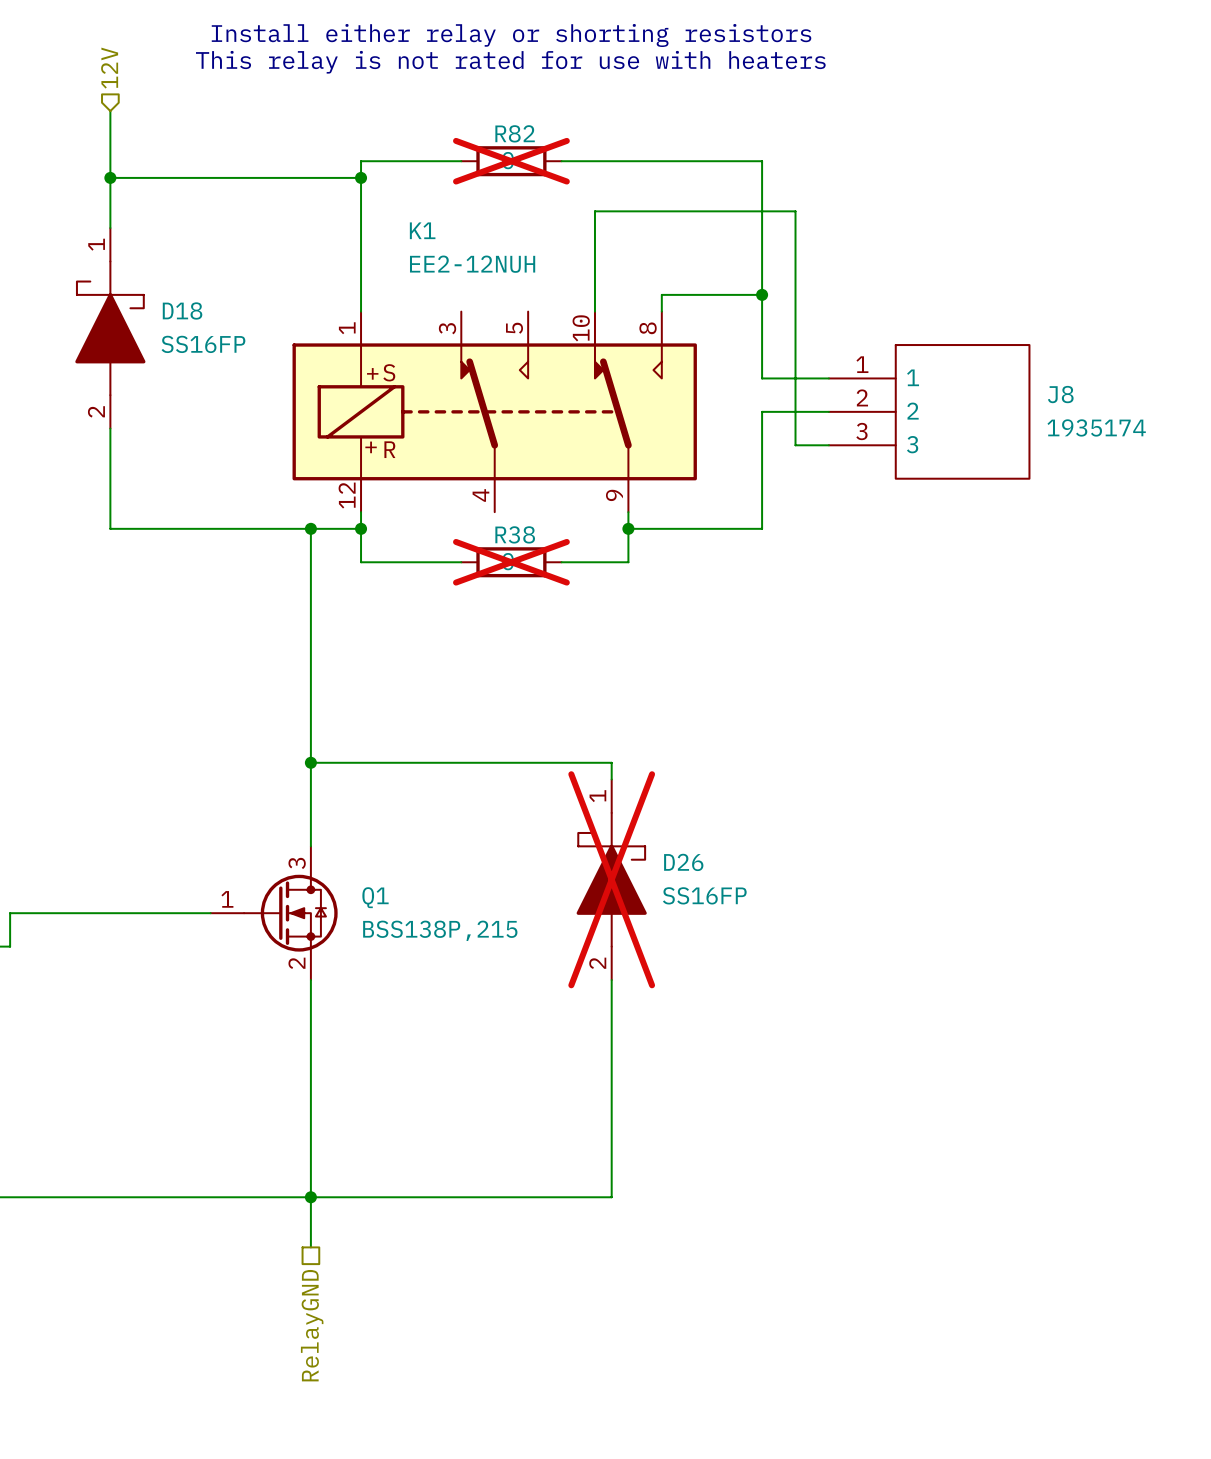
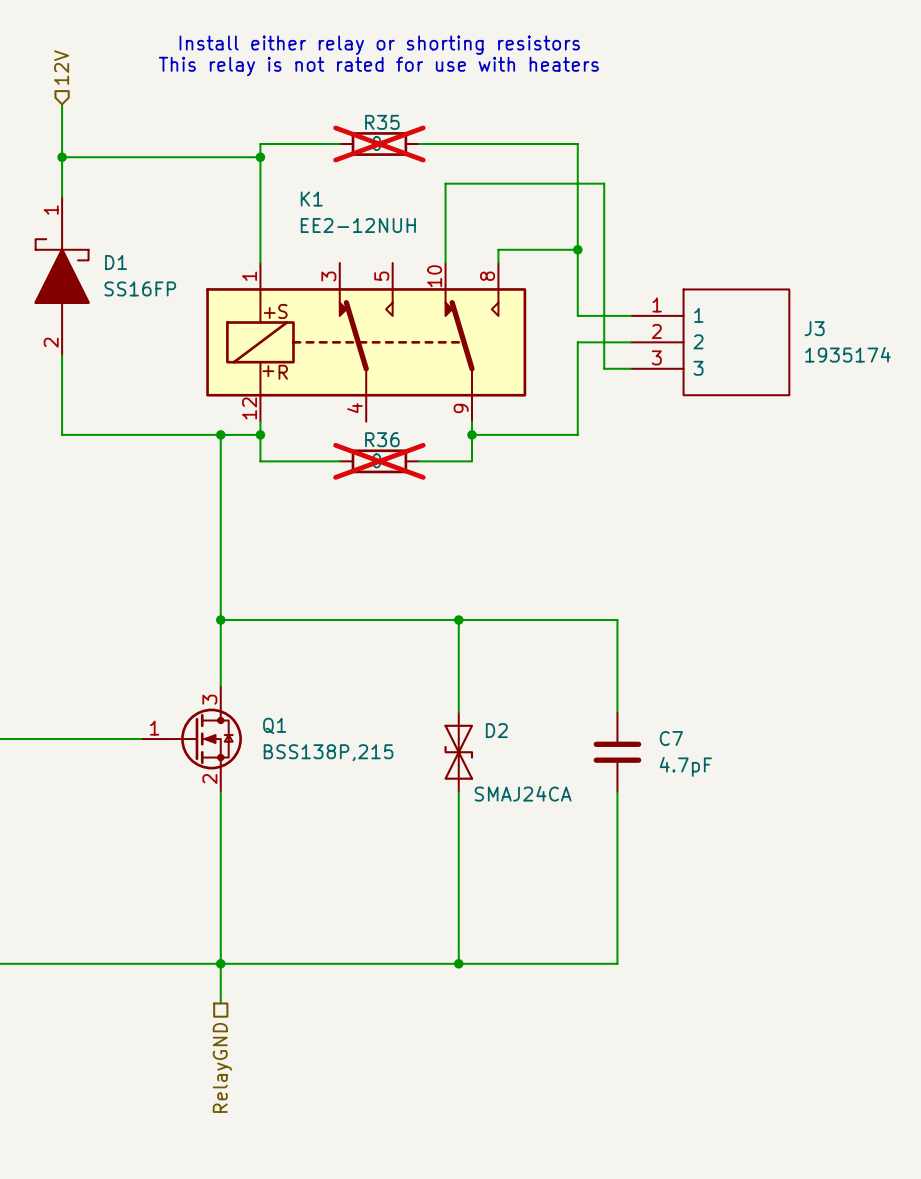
R82 name: R82 (515, 133) -> R35 (382, 122)
D18 name: D18 (182, 310) -> D1 (116, 262)
J8 name: J8 (1060, 394) -> J3 (814, 328)
R38 name: R38 (515, 534) -> R36 (382, 439)
wire: none -> (458, 620) (617, 620) (617, 712)
junction: none -> (458, 620)
D26: SS16FP (611, 879) -> none
D2: none -> SMAJ24CA (458, 752)
C7: none -> 4.7pF (617, 752)
wire: none -> (617, 791) (617, 963) (458, 963)
junction: none -> (458, 963)

